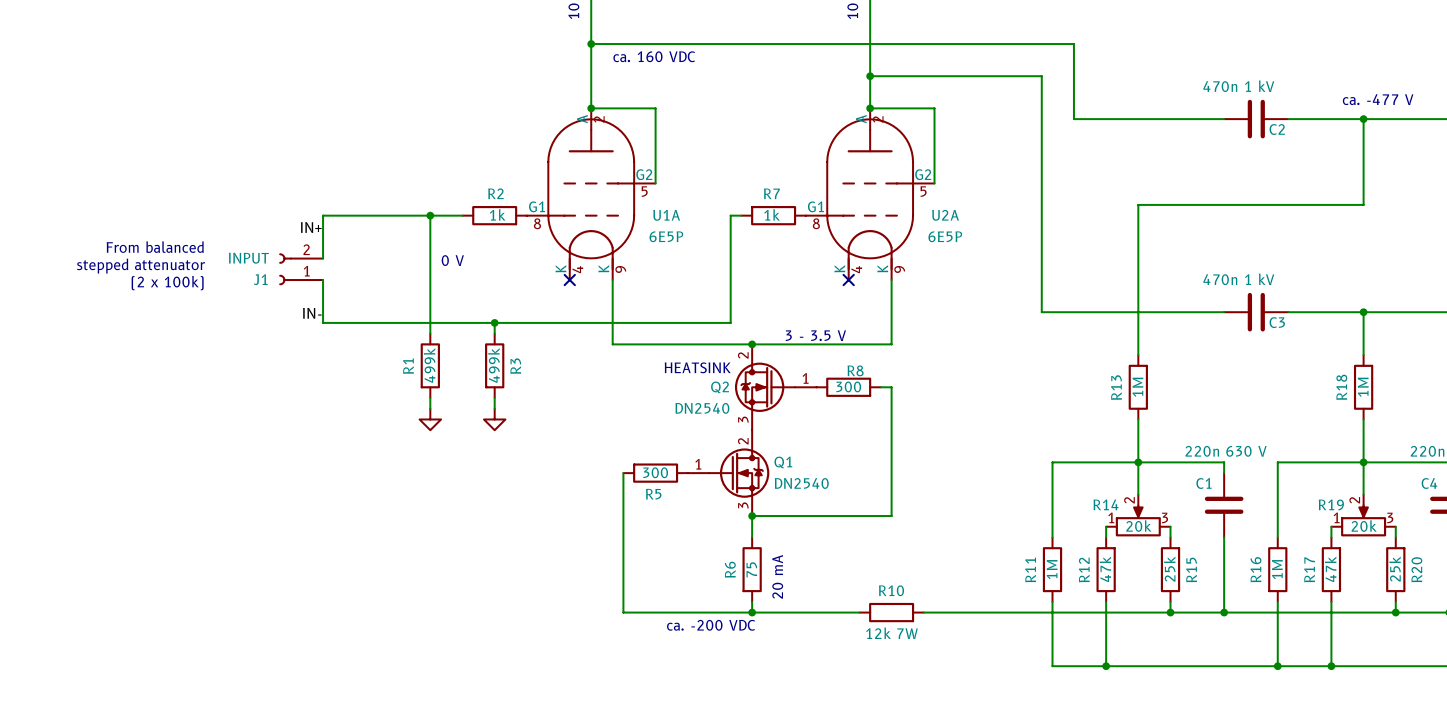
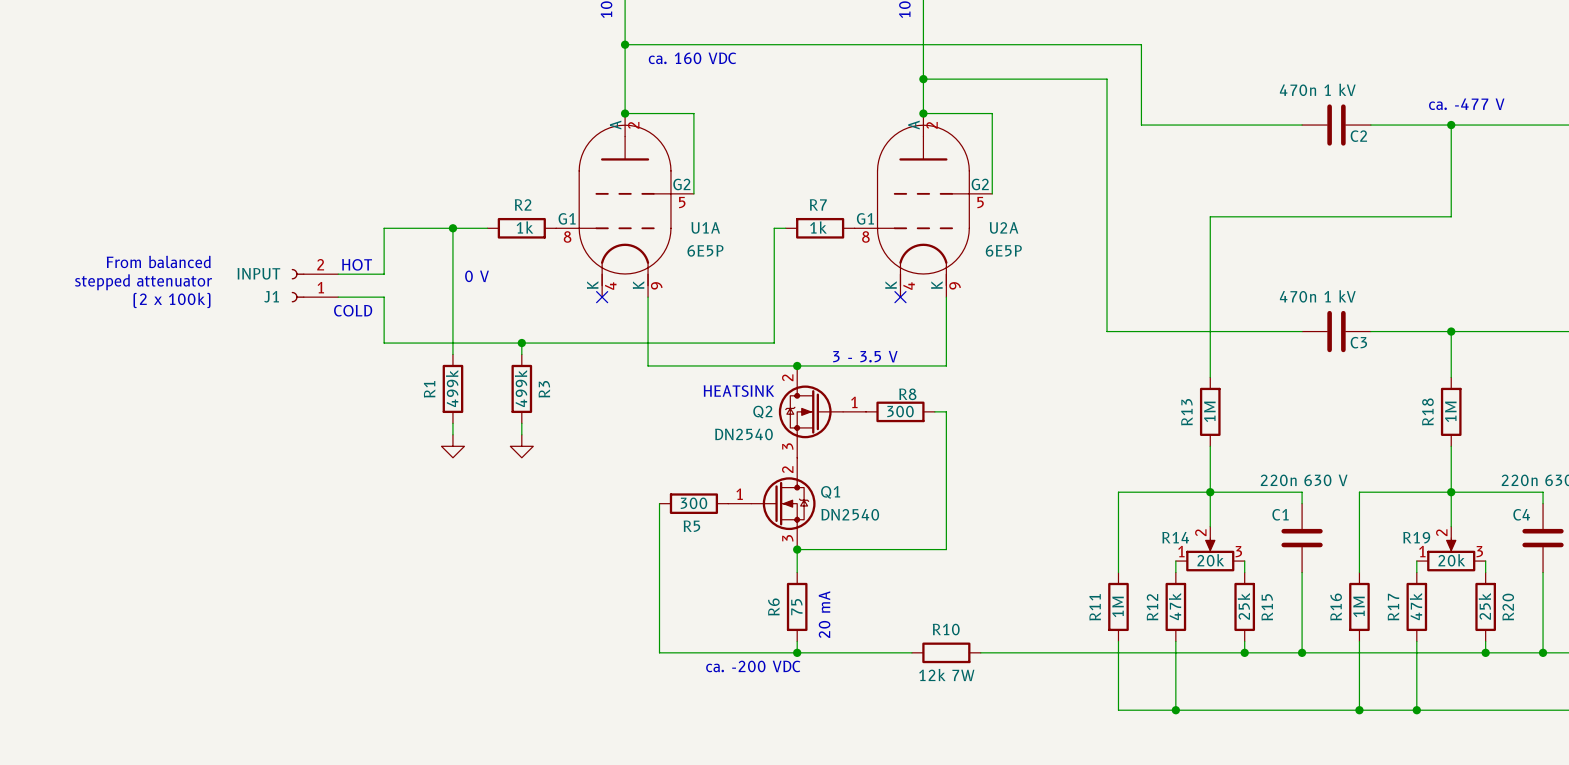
wire: (365, 215) (323, 215) (323, 258) -> (384, 228) (384, 274) (338, 274)
label: IN+ (311, 227) -> none
text: none -> HOT (357, 264)
wire: (323, 280) (323, 322) (365, 322) -> (338, 297) (384, 297) (384, 343)
text: none -> COLD (353, 310)
label: IN- (312, 313) -> none

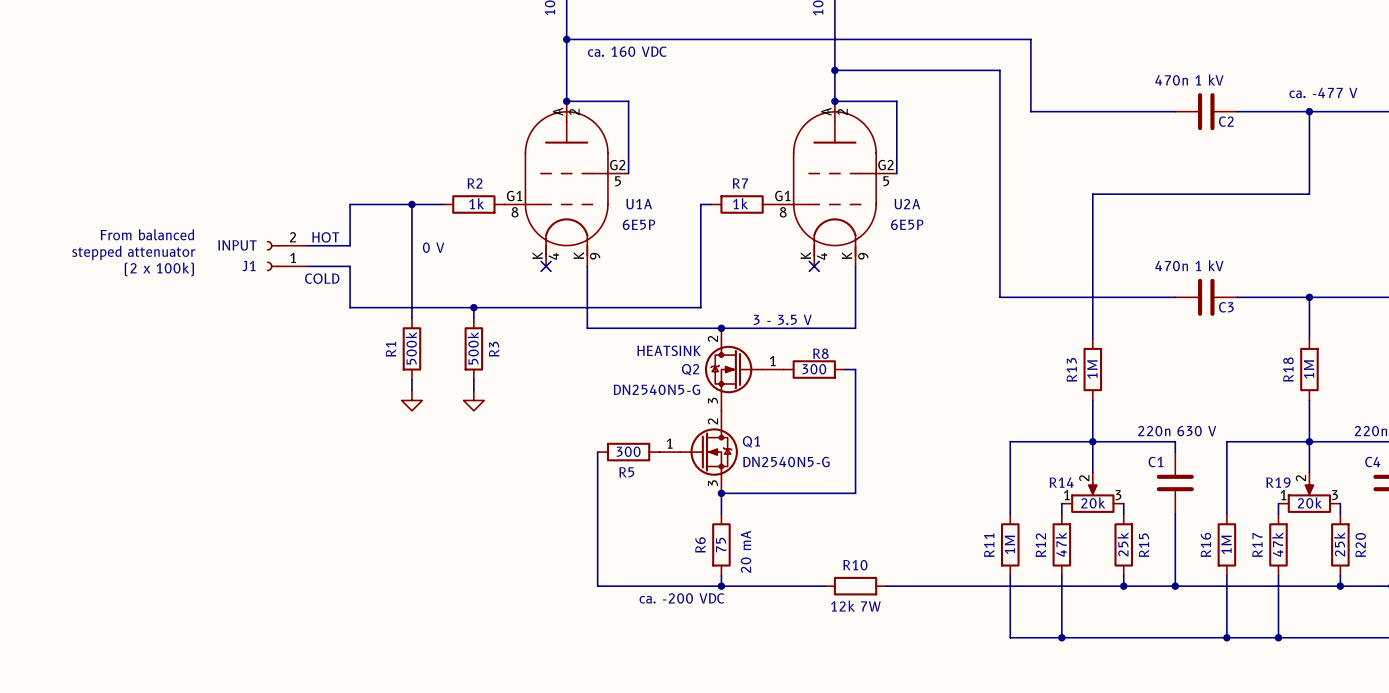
R1 value: 499k (452, 388) -> 500k (411, 348)
R3 value: 499k (521, 388) -> 500k (473, 348)
Q2 value: DN2540 (743, 434) -> DN2540N5-G (656, 389)
Q1 value: DN2540 (850, 514) -> DN2540N5-G (786, 462)

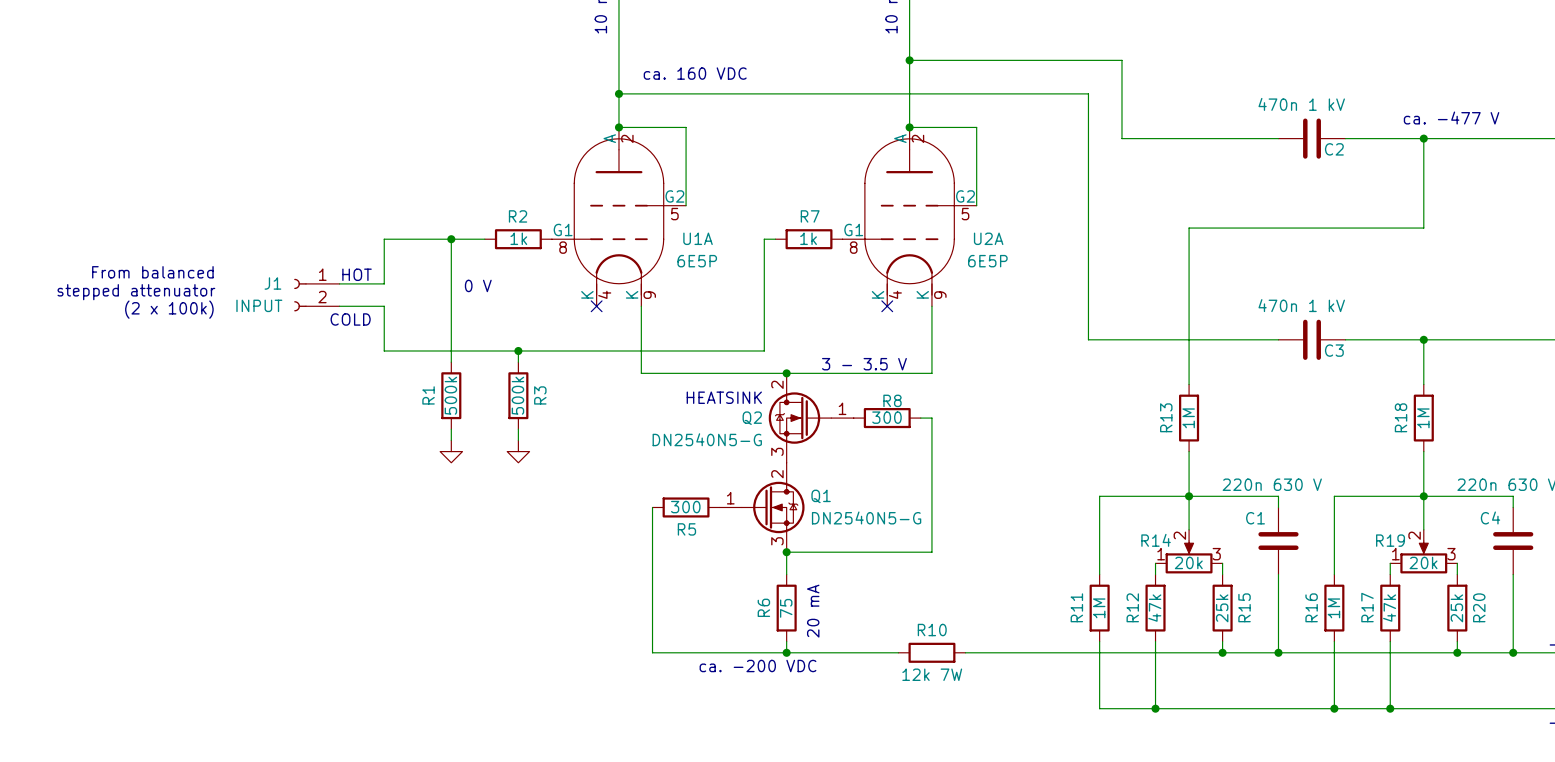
wire: (566, 39) (834, 39) -> (618, 93) (909, 93)
junction position: (566, 39) -> (618, 93)
junction position: (834, 70) -> (909, 60)
J1 flip: as is (272, 256) -> up-down (300, 295)

